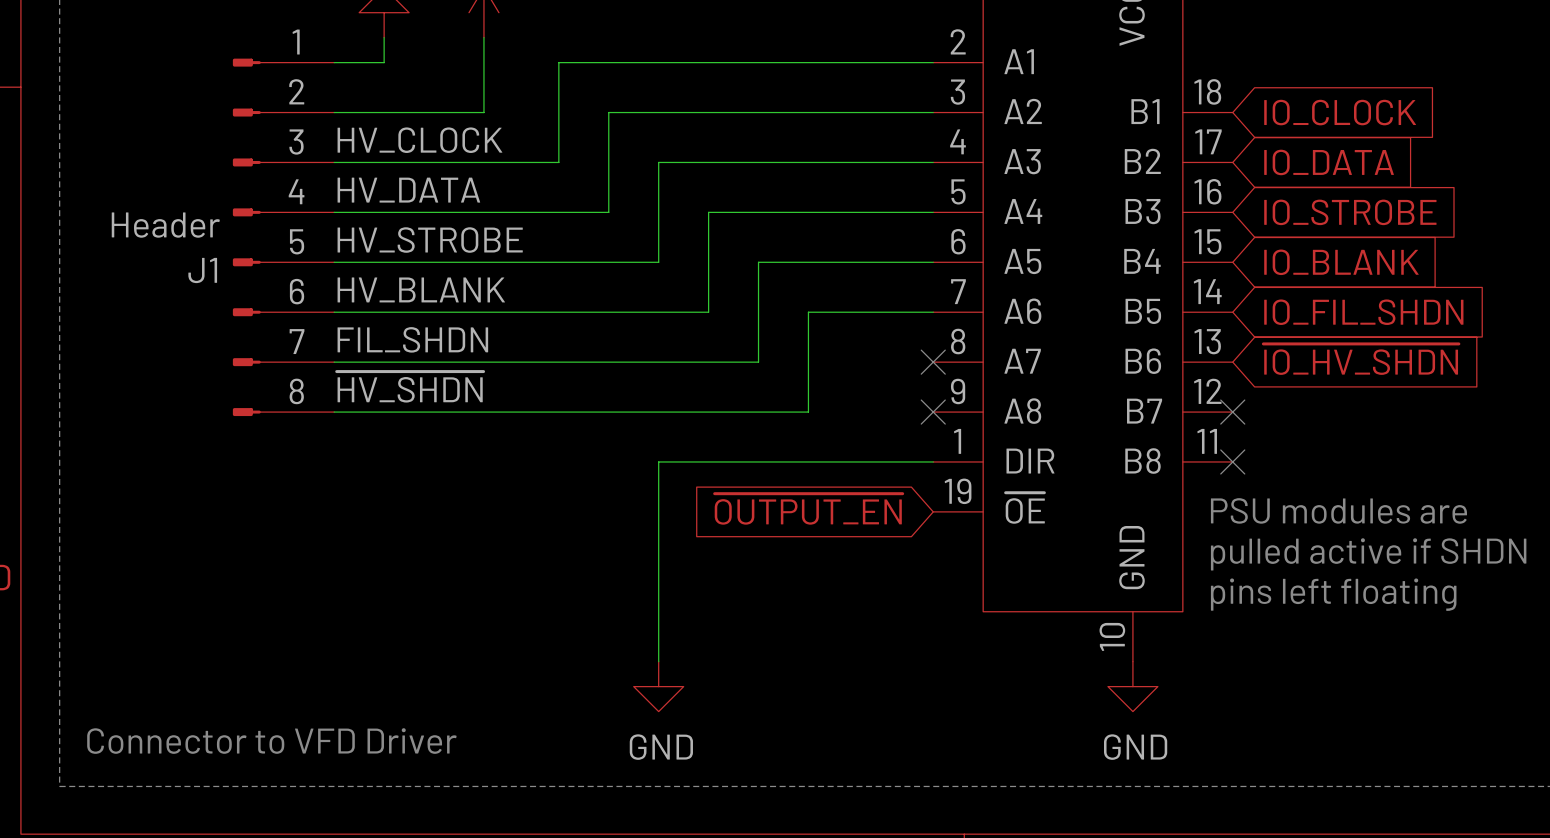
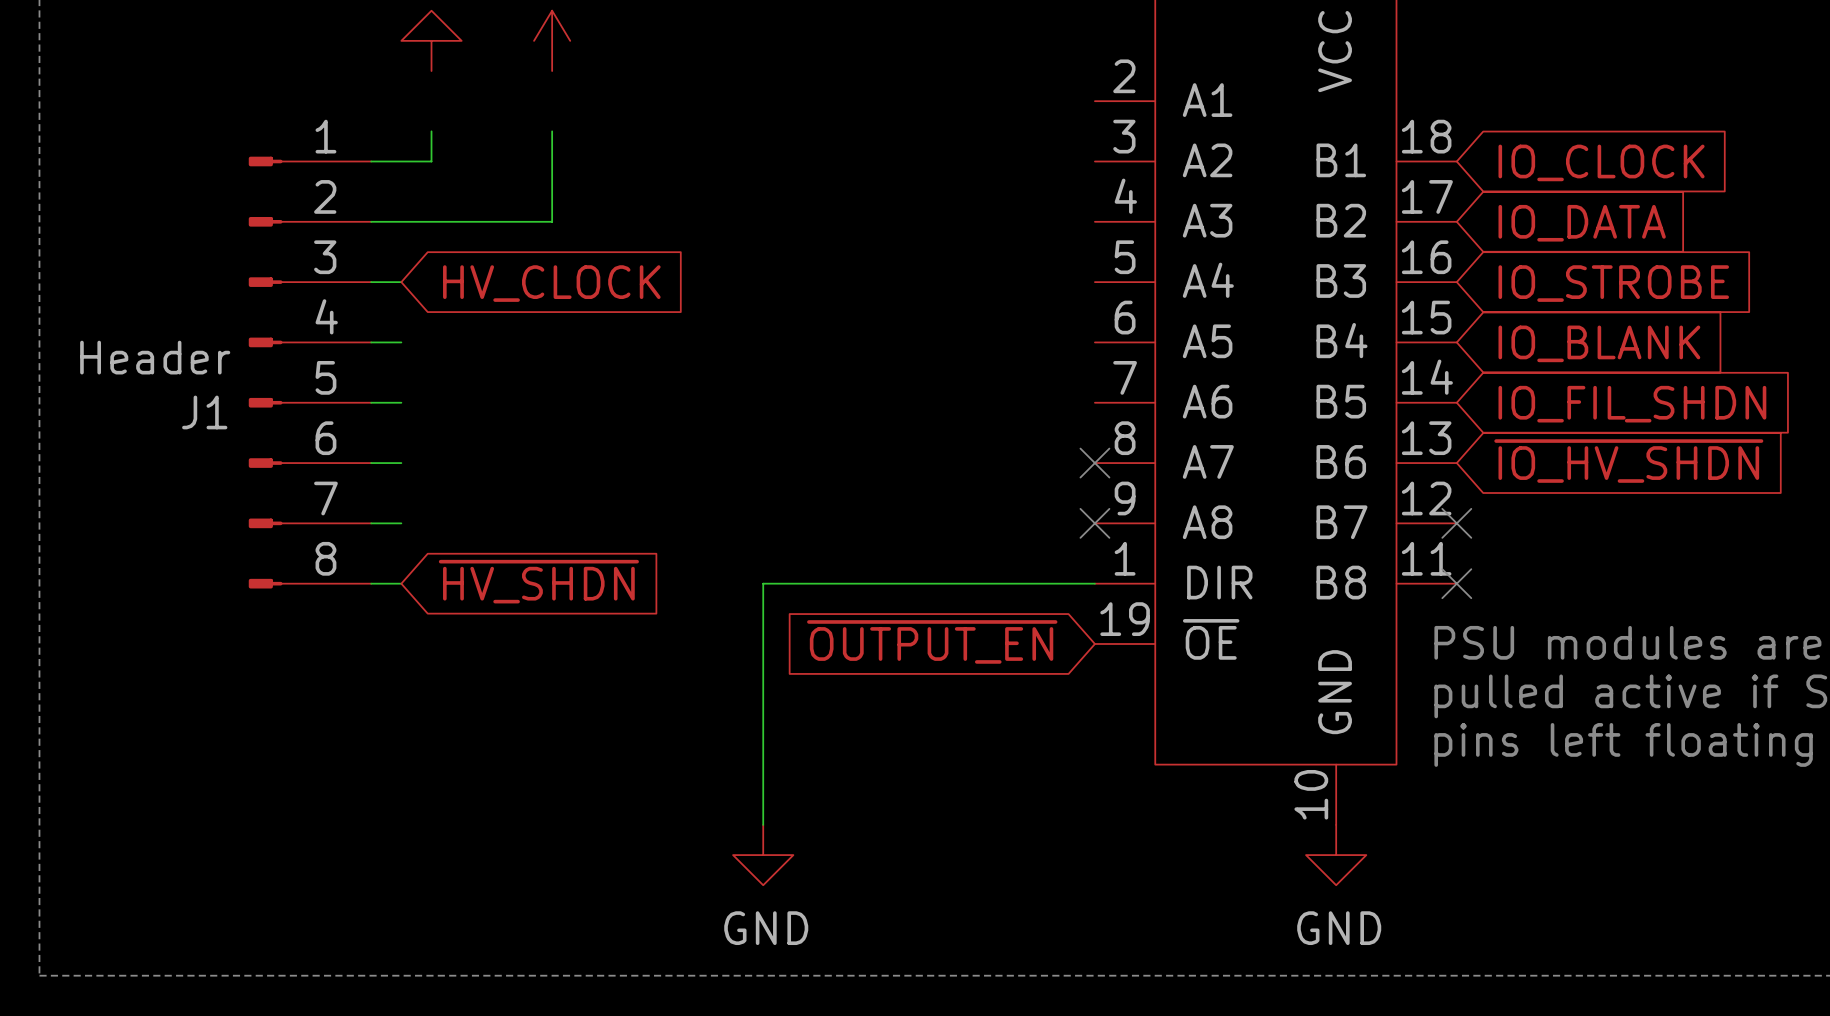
wire: (384, 37) (384, 62) (334, 62) -> none
wire: (483, 37) (483, 87) -> none
wire: (933, 62) (558, 62) (558, 162) (483, 162) -> (552, 161) (552, 221)
wire: (384, 112) (483, 112) -> (431, 161) (431, 131)
wire: (933, 112) (608, 112) (608, 212) (359, 212) -> none
label: HV_CLOCK (419, 140) -> none
wire: (933, 162) (658, 162) (658, 262) (359, 262) -> none
label: HV_DATA (408, 190) -> none
global label: none -> HV_CLOCK (551, 283)
wire: (933, 212) (708, 212) (708, 312) (359, 312) -> none
J1 position: (283, 237) -> (309, 372)
label: HV_STROBE (430, 240) -> none
wire: (933, 262) (758, 262) (758, 362) (359, 362) -> none
label: HV_BLANK (421, 289) -> none
wire: (933, 312) (808, 312) (808, 412) (359, 412) -> none
label: FIL_SHDN (412, 339) -> none
label: ~{HV_SHDN} (410, 387) -> none
global label: none -> ~{HV_SHDN} (538, 581)
wire: none -> (371, 583) (401, 583)
text: Connector to VFD Driver (271, 741) -> none

